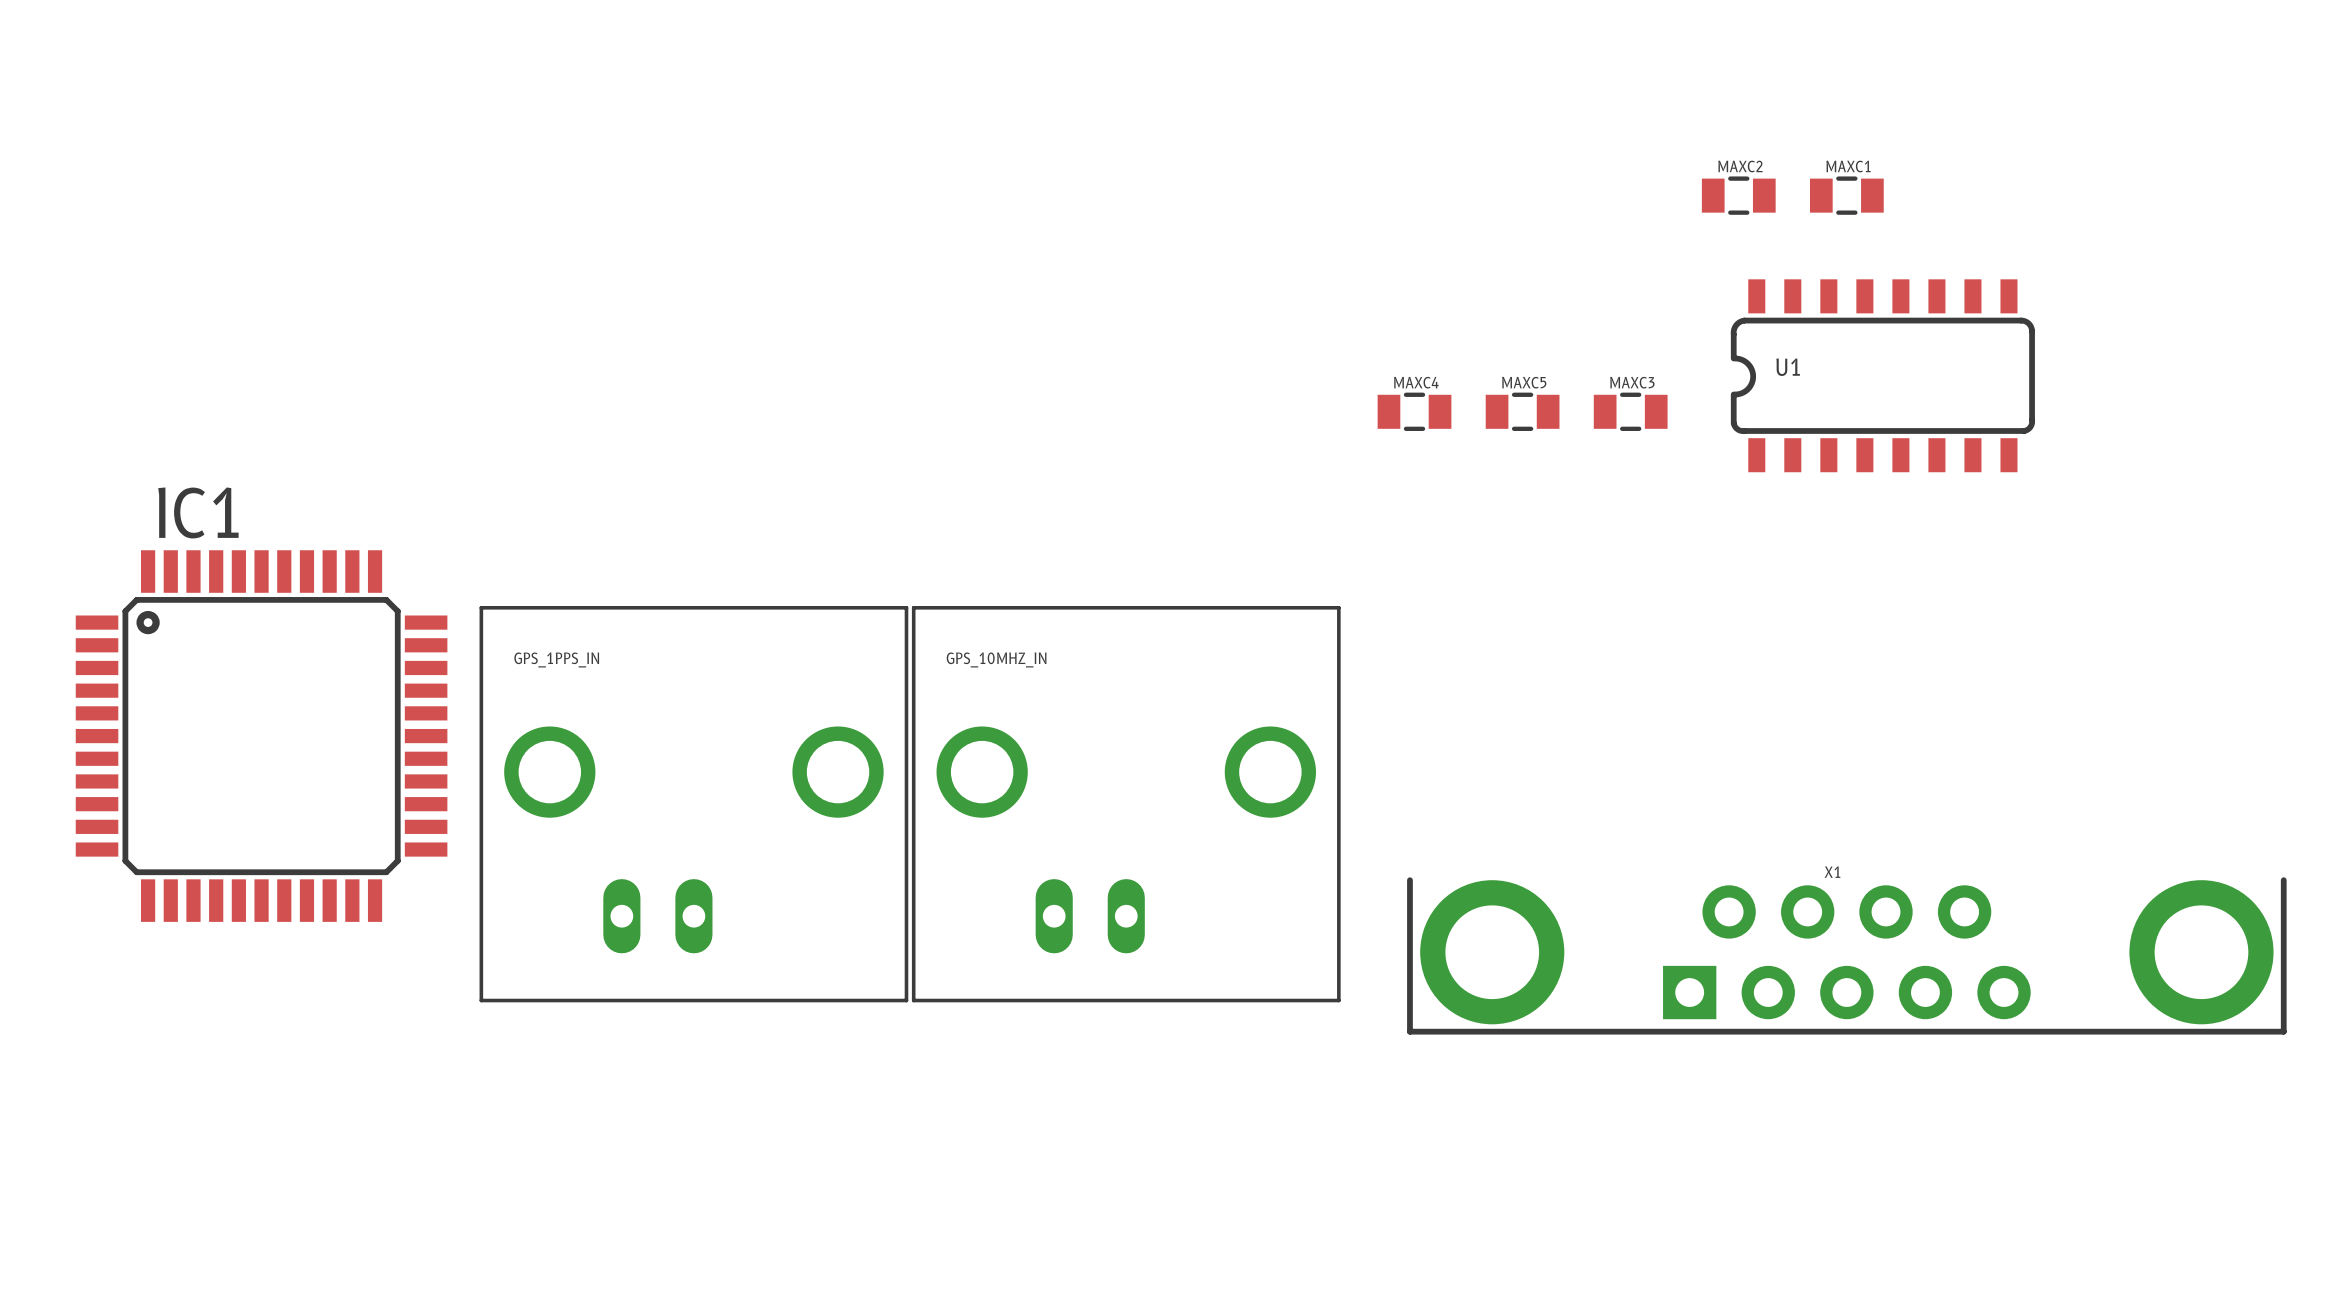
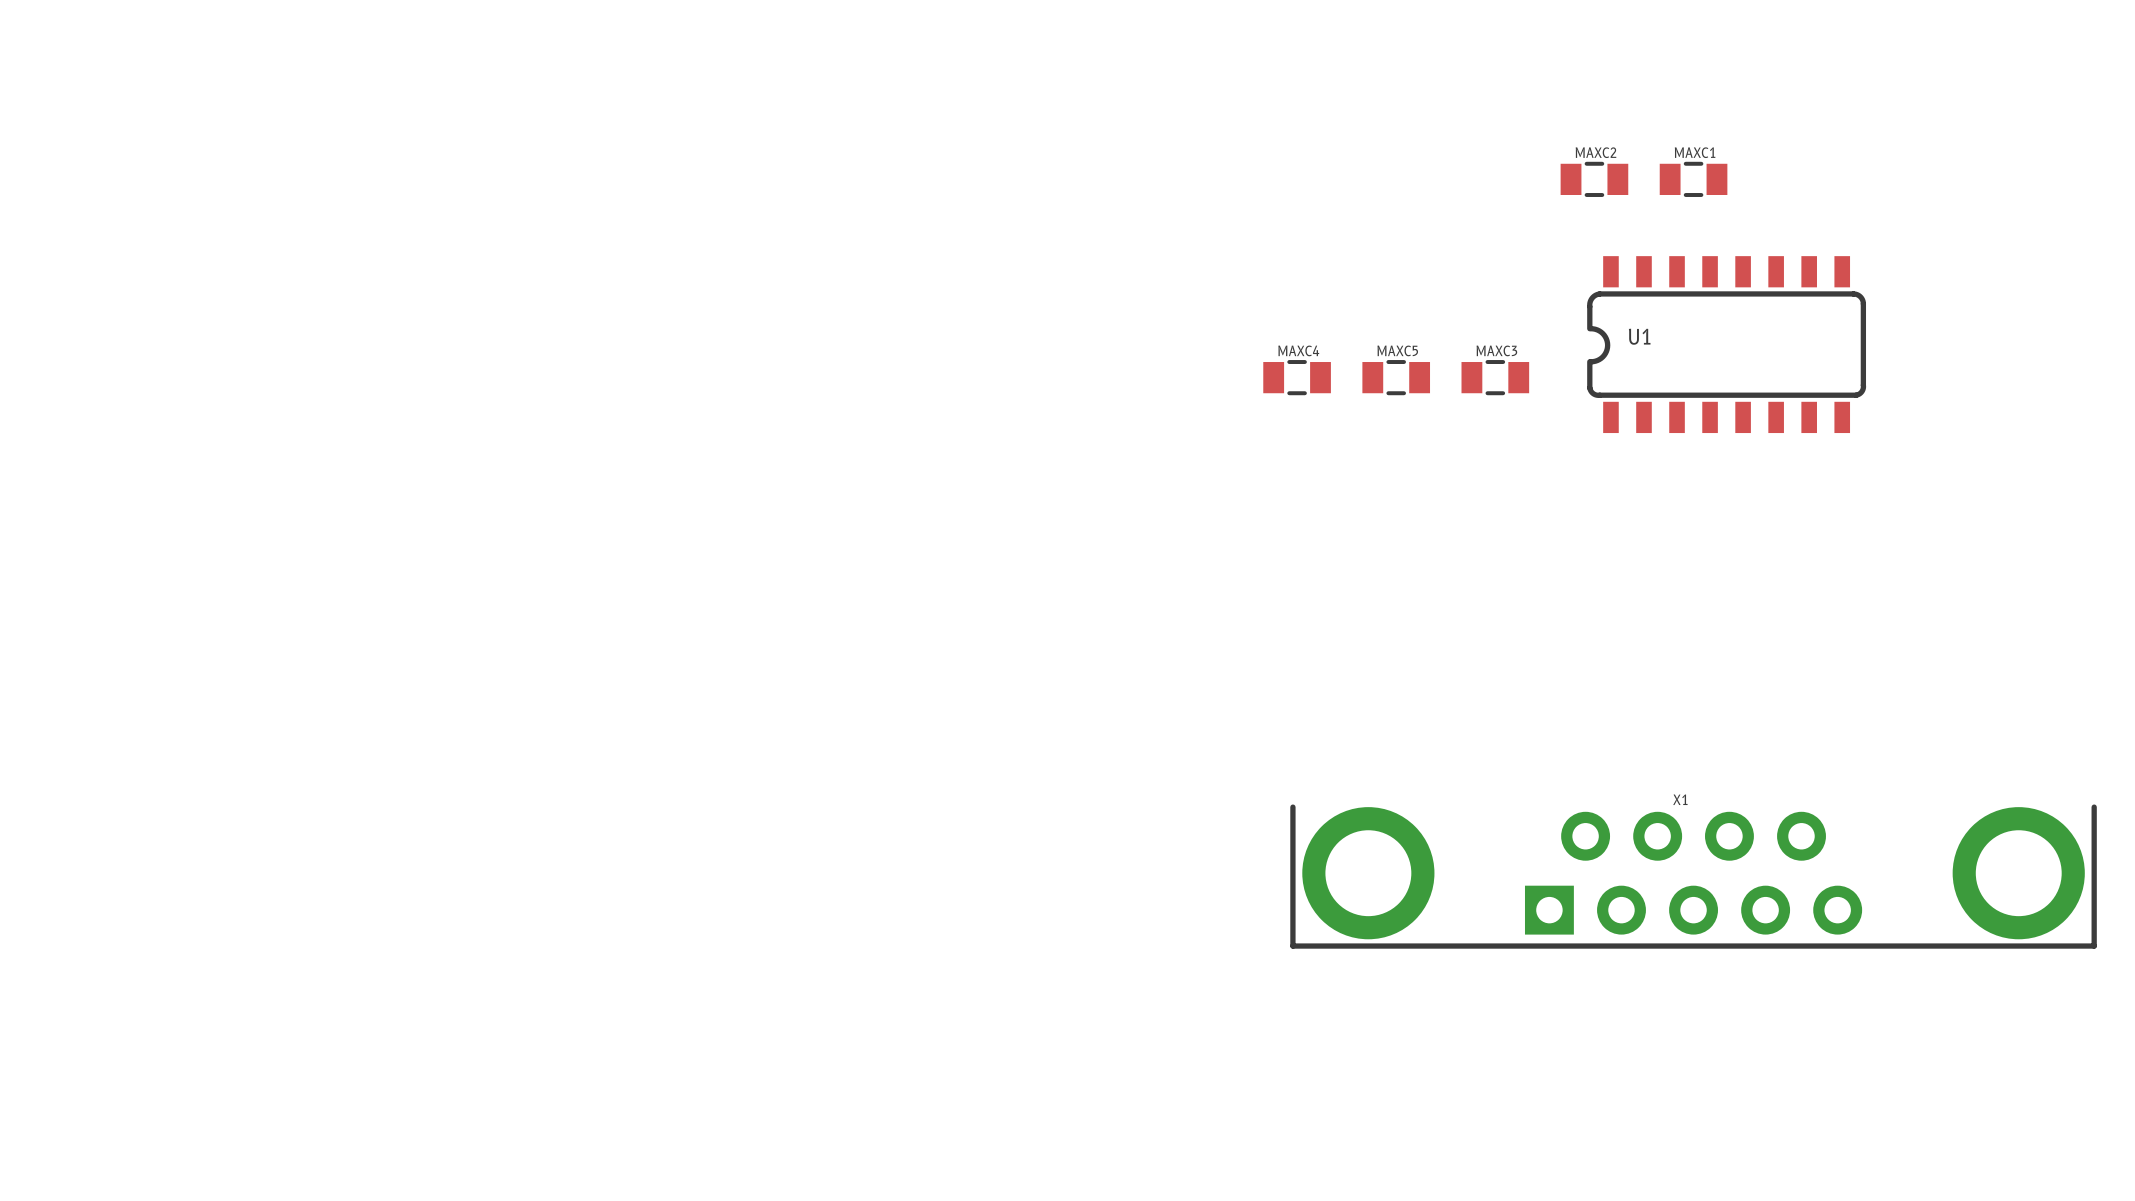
IC1: (261, 736) -> none
GPS_1PPS_IN: (693, 804) -> none
GPS_10MHZ_IN: (1126, 804) -> none

